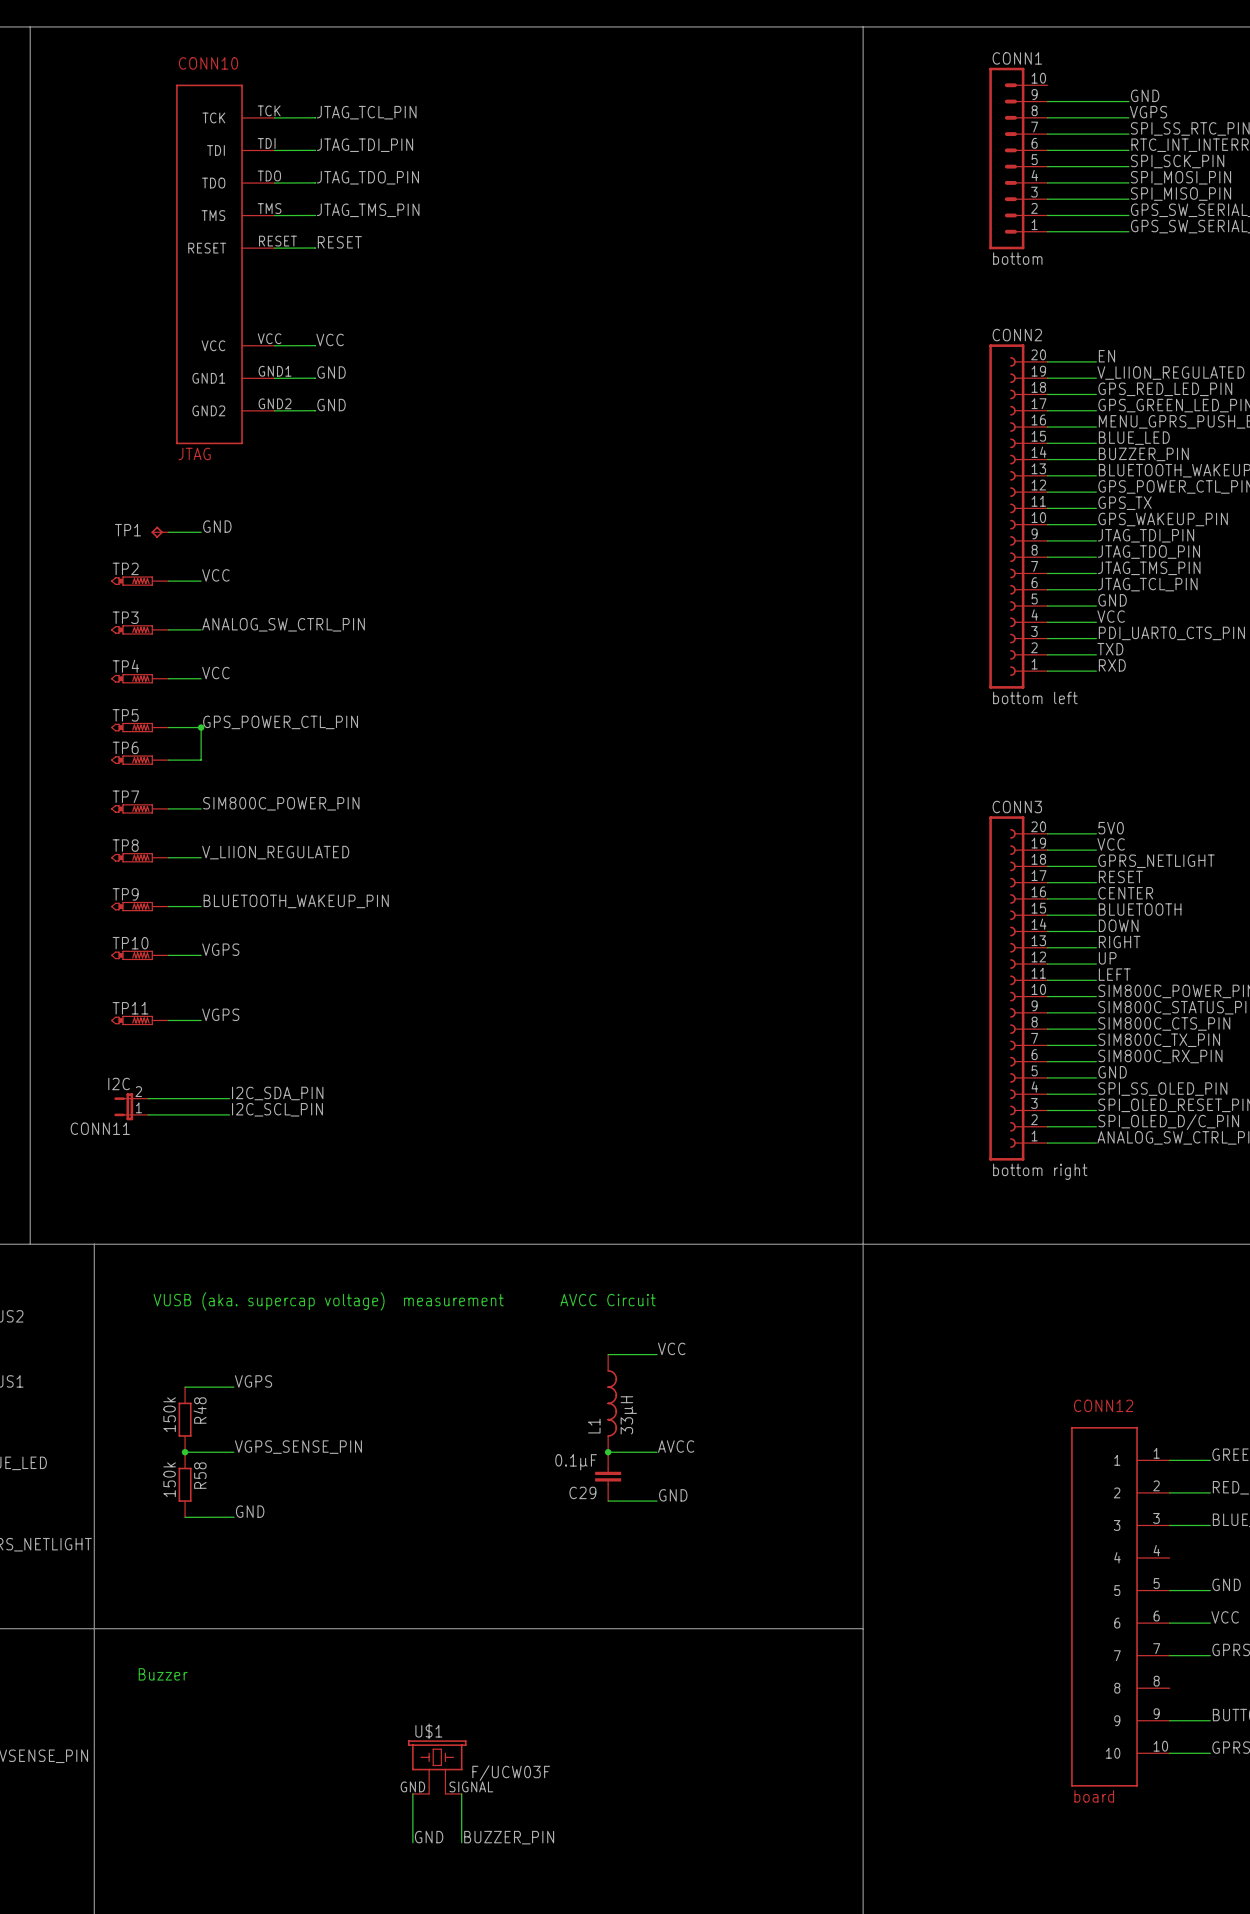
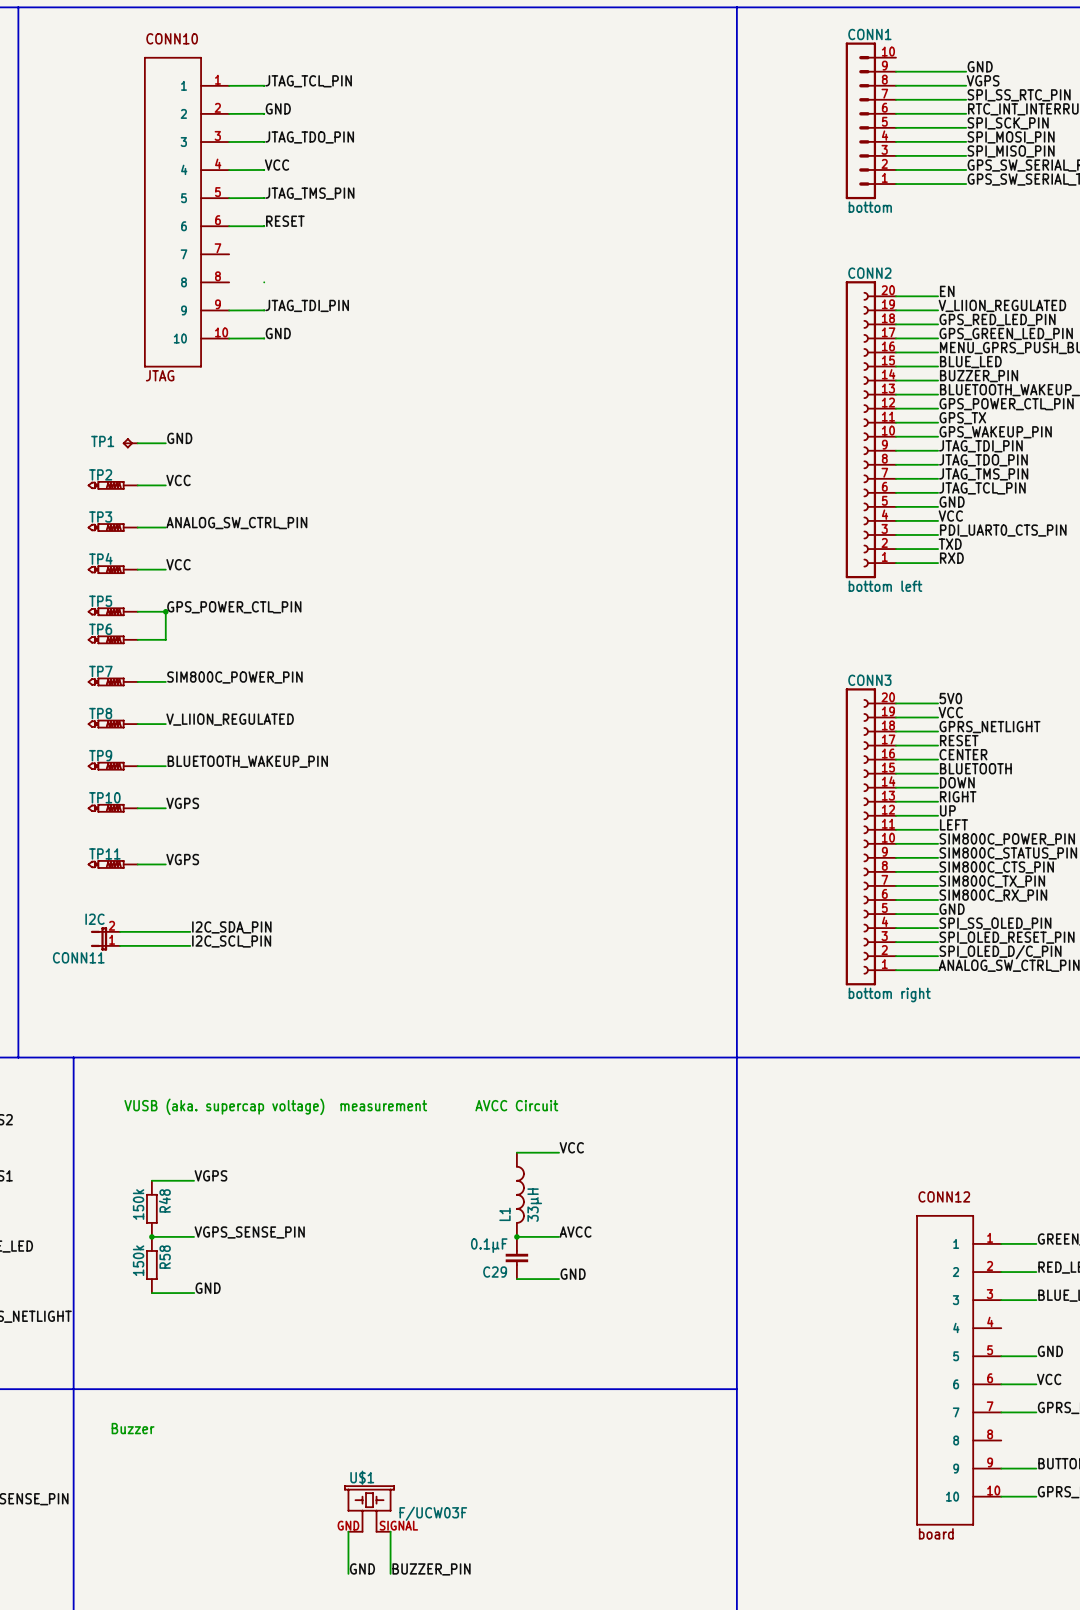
CONN10 symbol: [176, 84, 275, 445] -> [144, 57, 230, 368]
label: JTAG_TDI_PIN (364, 145) -> GND (278, 108)
label: JTAG_TMS_PIN (368, 210) -> VCC (277, 165)
label: RESET (339, 242) -> JTAG_TMS_PIN (309, 193)
label: none -> RESET (285, 221)
label: VCC (330, 339) -> none
wire: (315, 345) (274, 345) -> (264, 226) (229, 226)
label: GND (331, 372) -> JTAG_TDI_PIN (307, 305)

